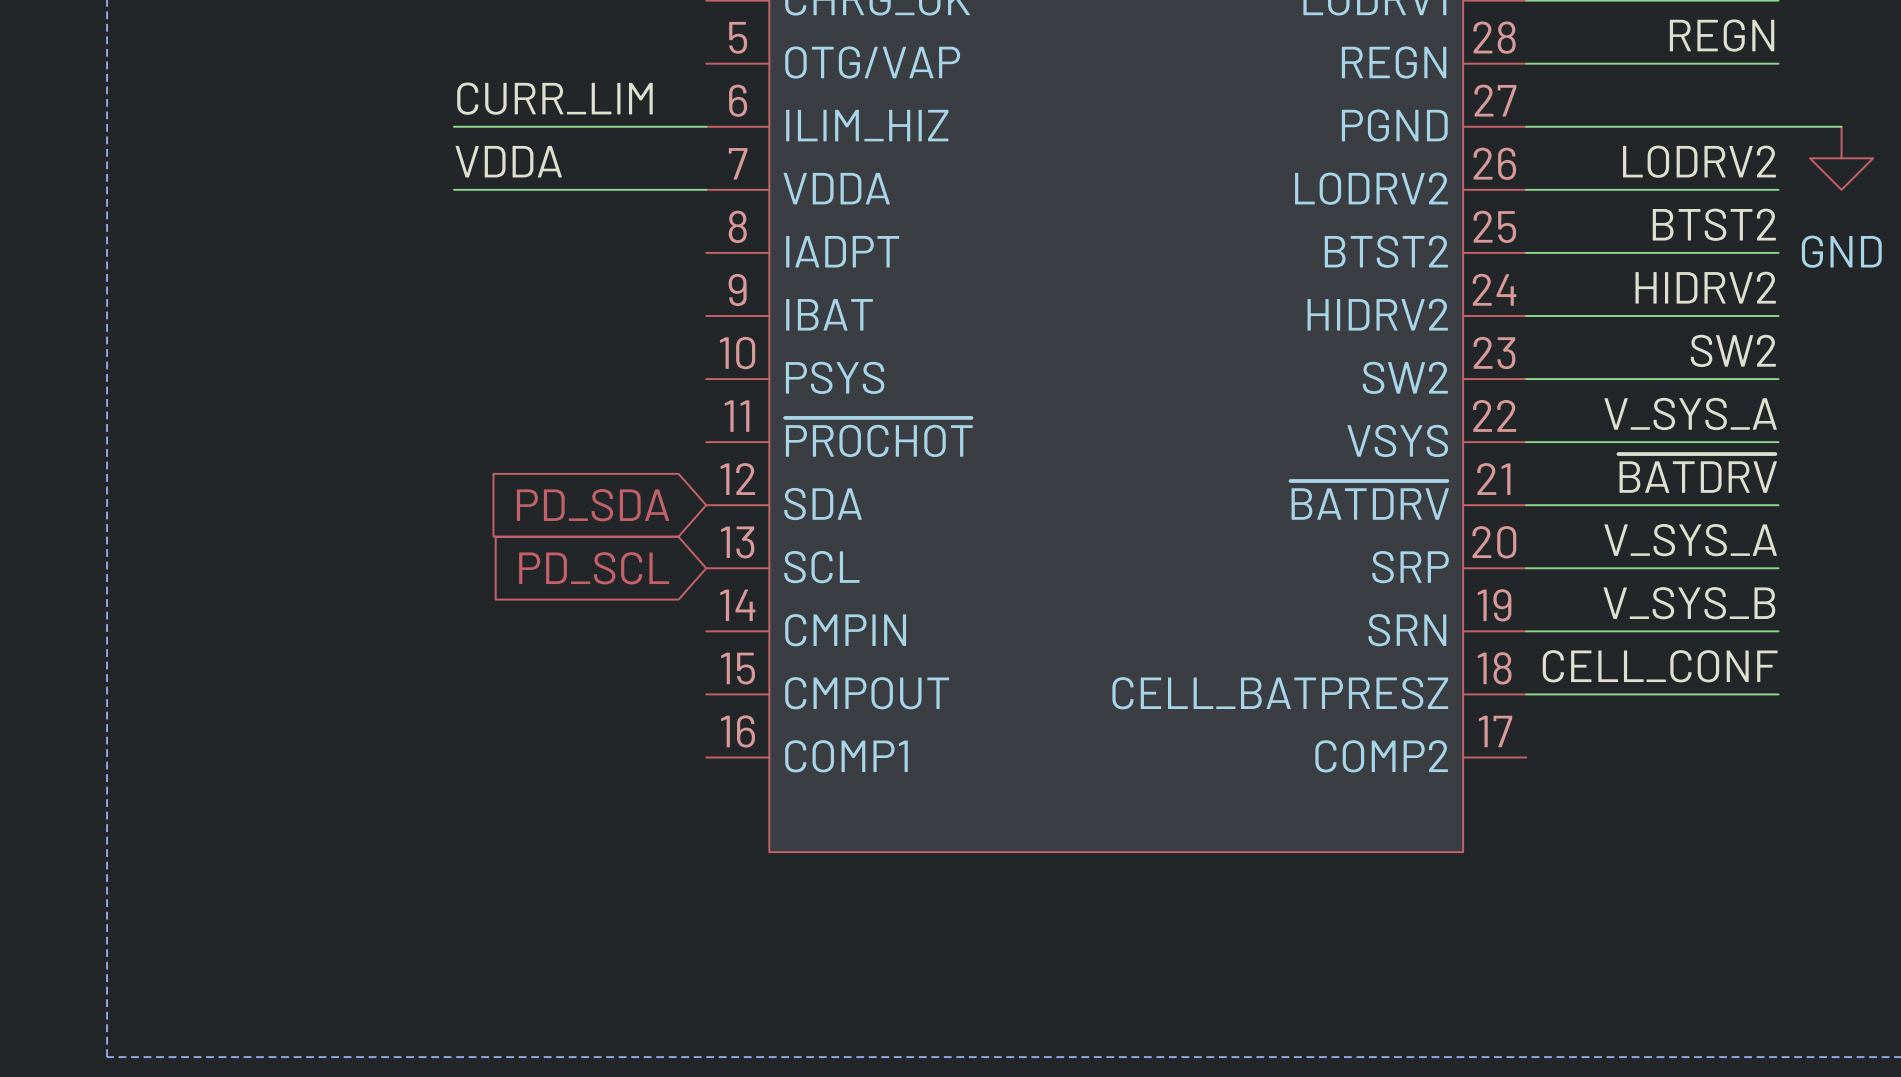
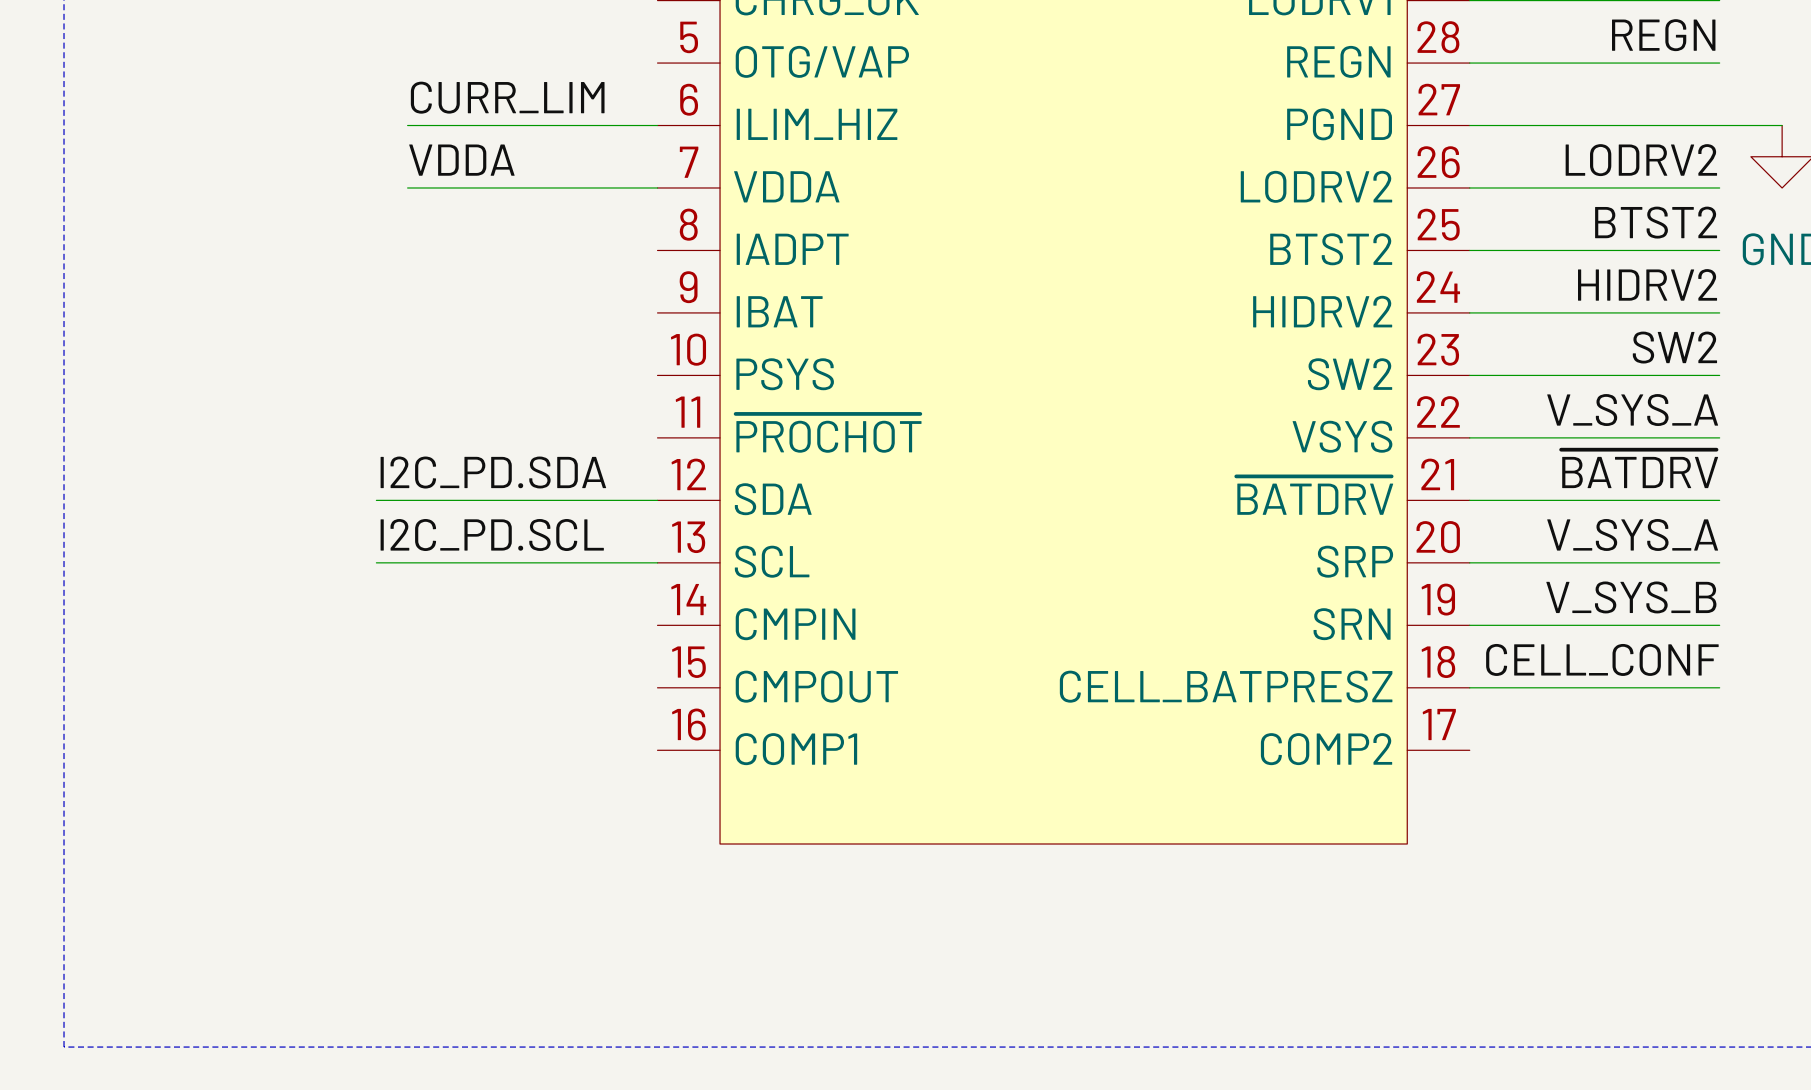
label: none -> I2C_PD.SDA (493, 472)
wire: none -> (376, 500) (657, 500)
global label: PD_SDA (593, 505) -> none
label: none -> I2C_PD.SCL (492, 535)
wire: none -> (376, 562) (657, 562)
global label: PD_SCL (594, 568) -> none

